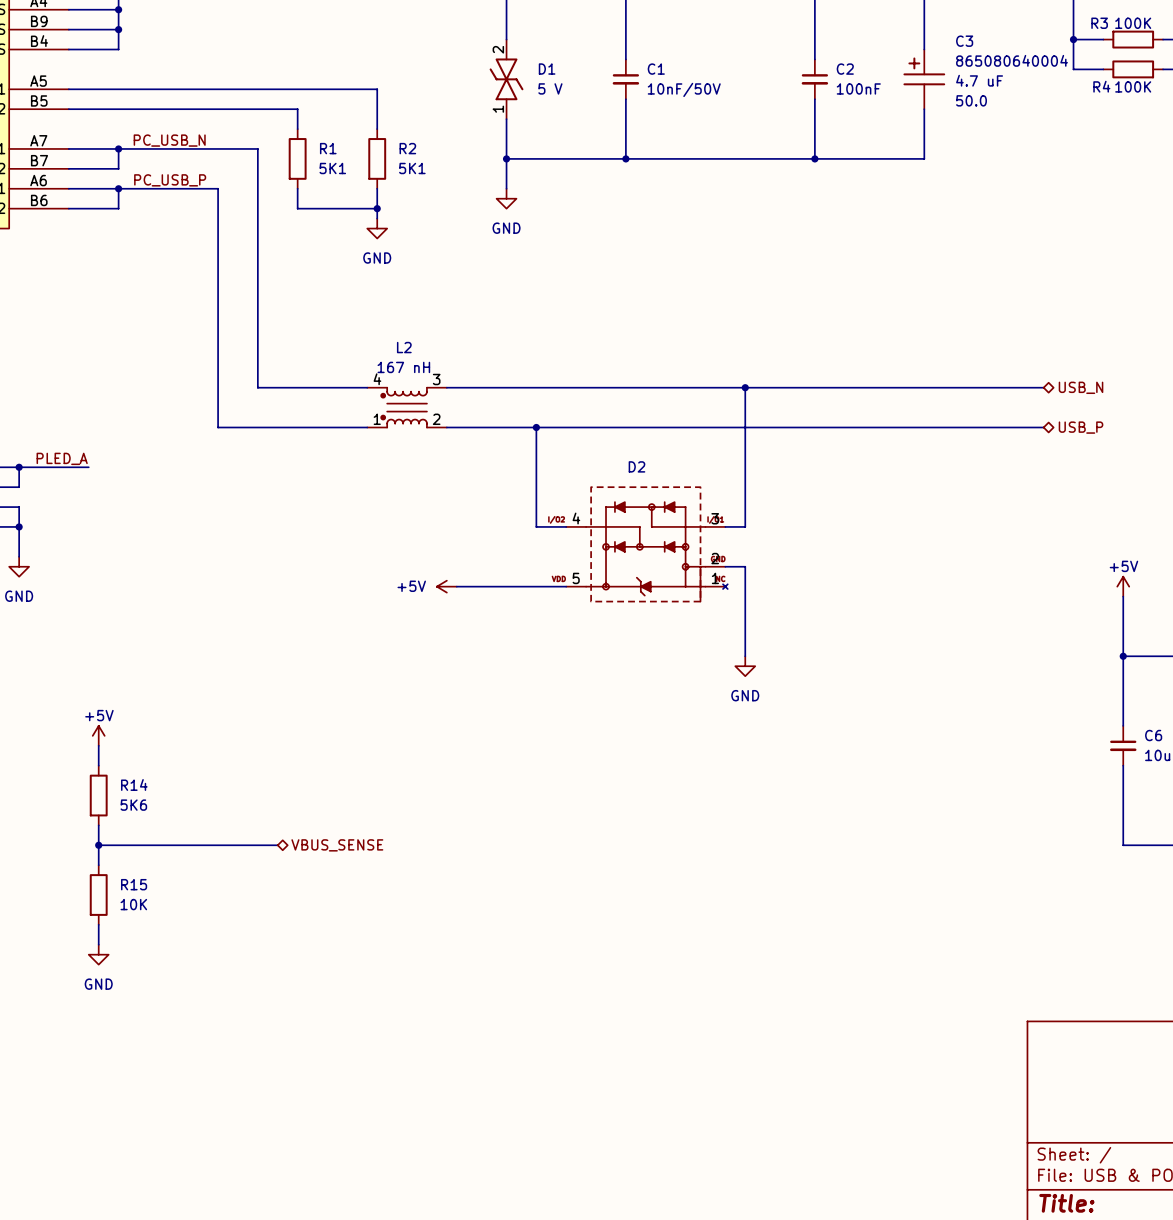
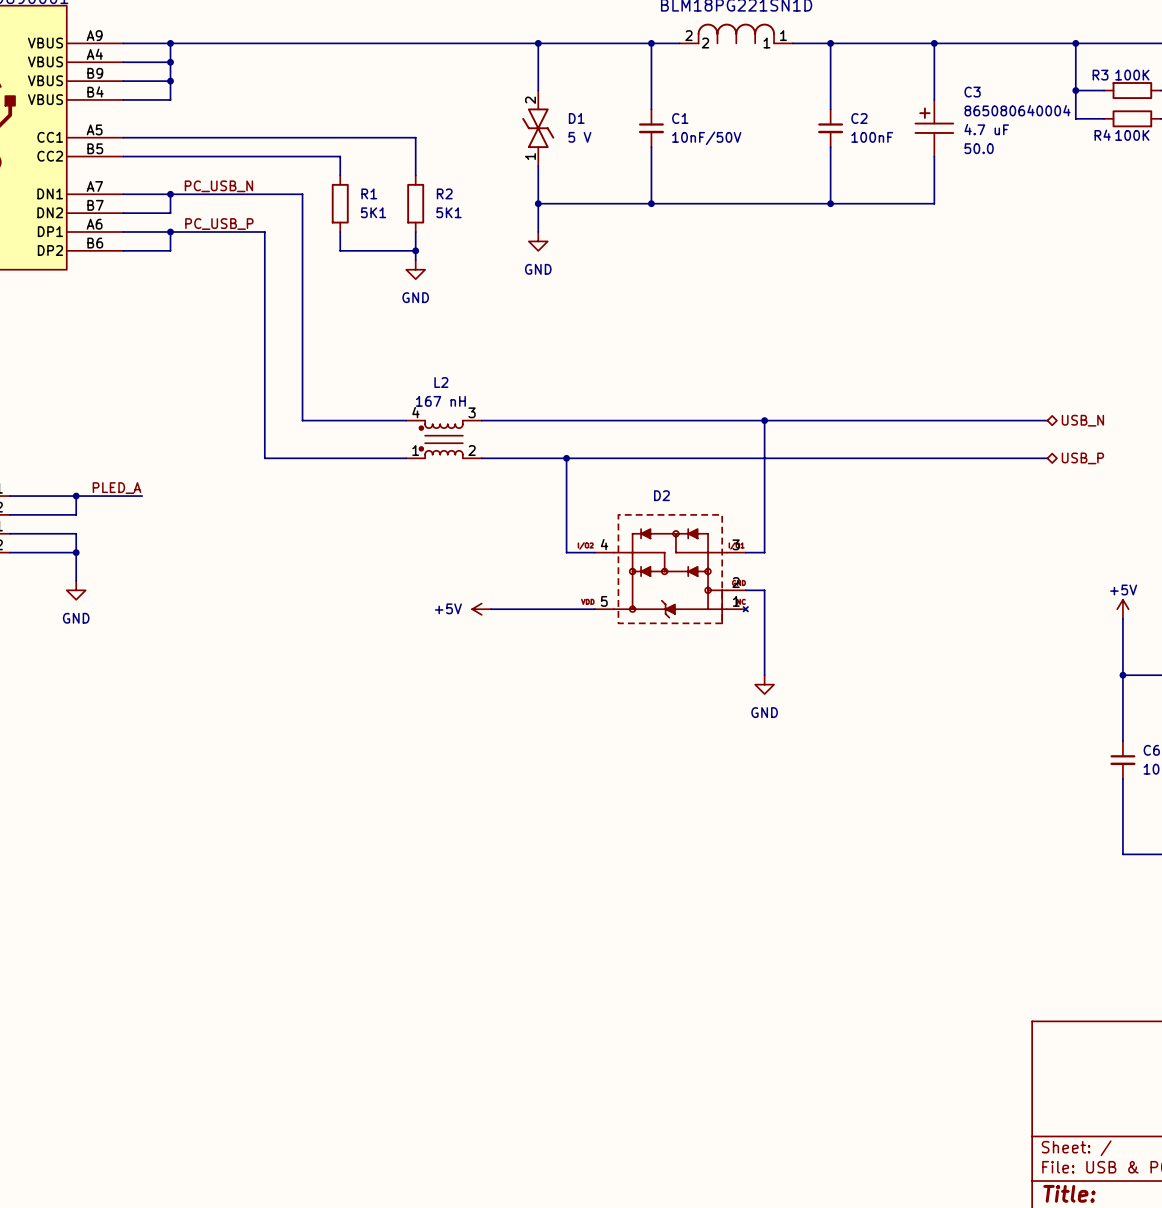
power symbol: +5V (98, 735) -> none
wire: (98, 745) (98, 765) -> none
R14: 5K6 (98, 795) -> none
wire: (98, 825) (98, 865) -> none
wire: (98, 845) (277, 845) -> none
junction: (98, 845) -> none
hierarchical label: VBUS_SENSE (337, 845) -> none
R15: 10K (98, 895) -> none
wire: (98, 924) (98, 944) -> none
power symbol: GND (98, 954) -> none

